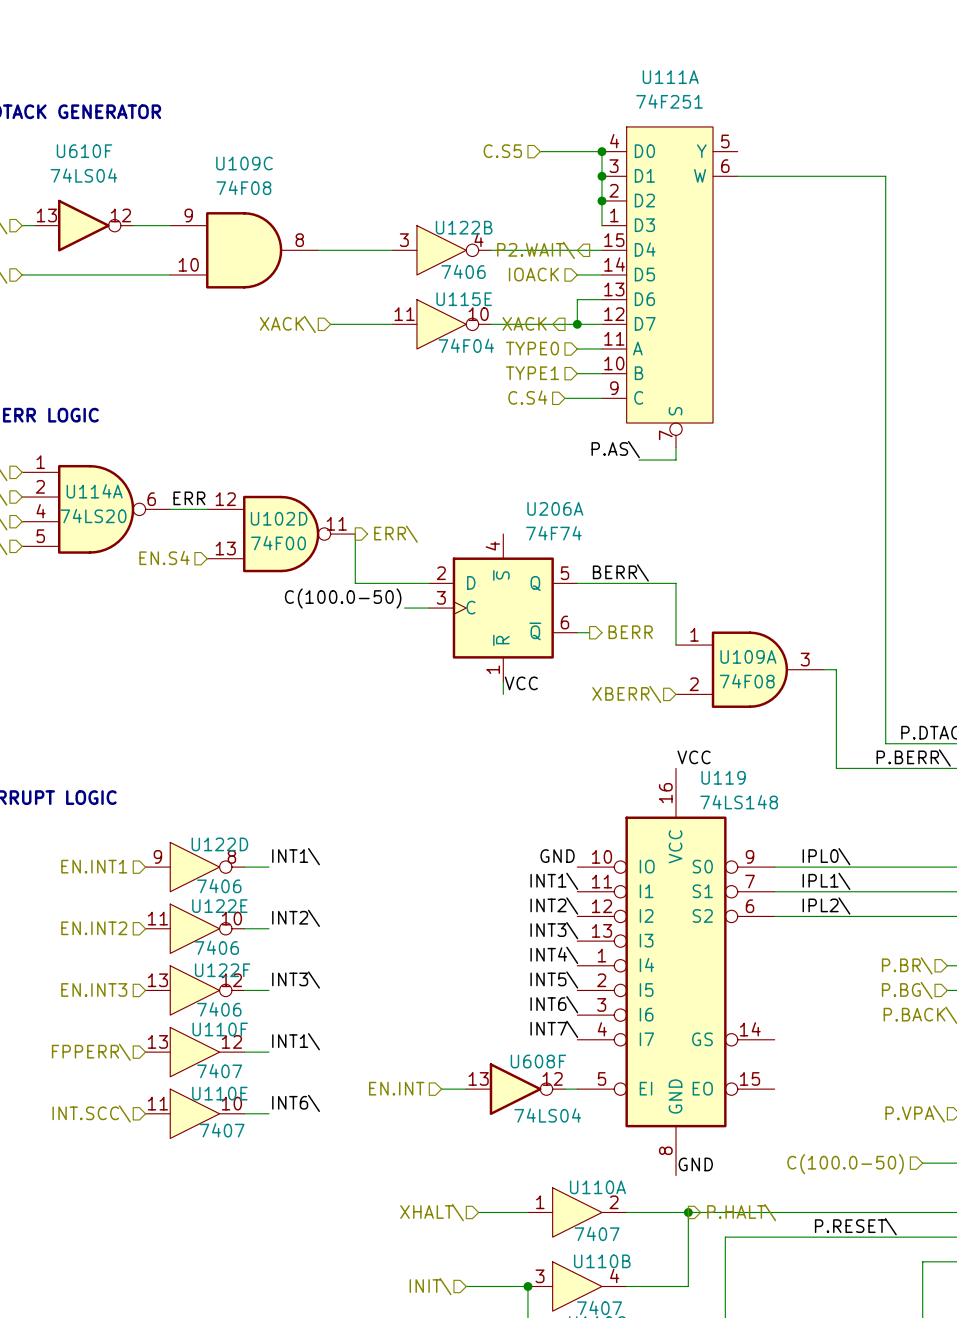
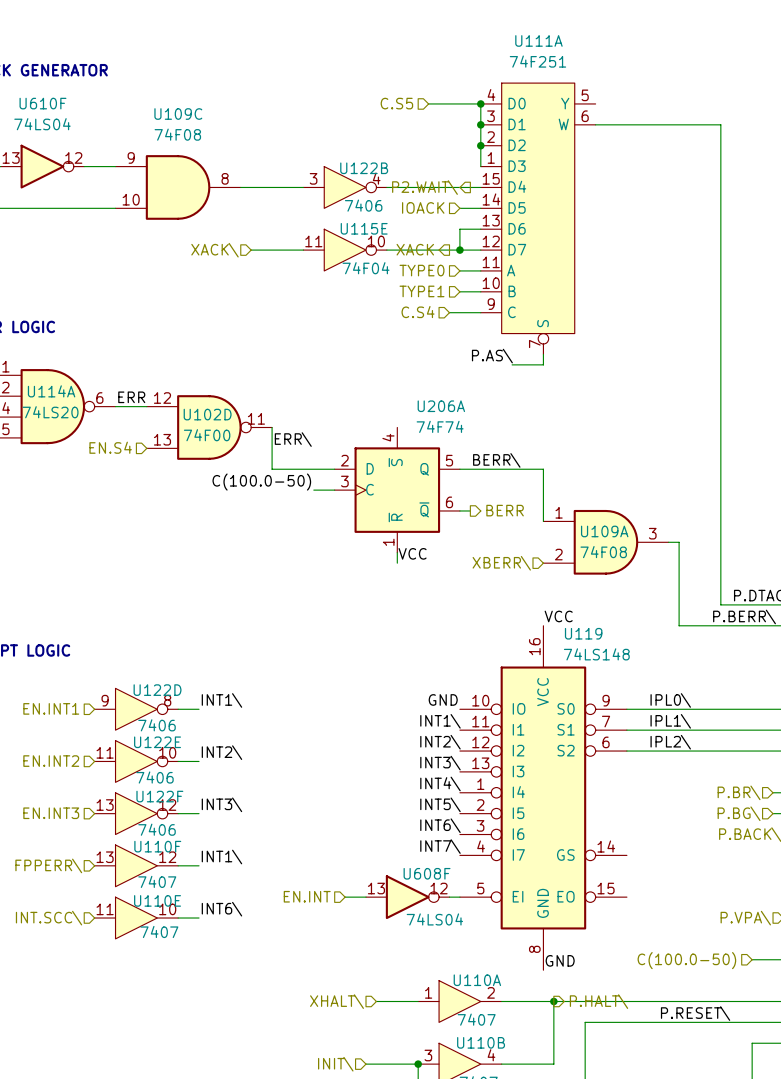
hierarchical label: ERR\ (396, 534) -> none
label: none -> ERR\ (293, 439)

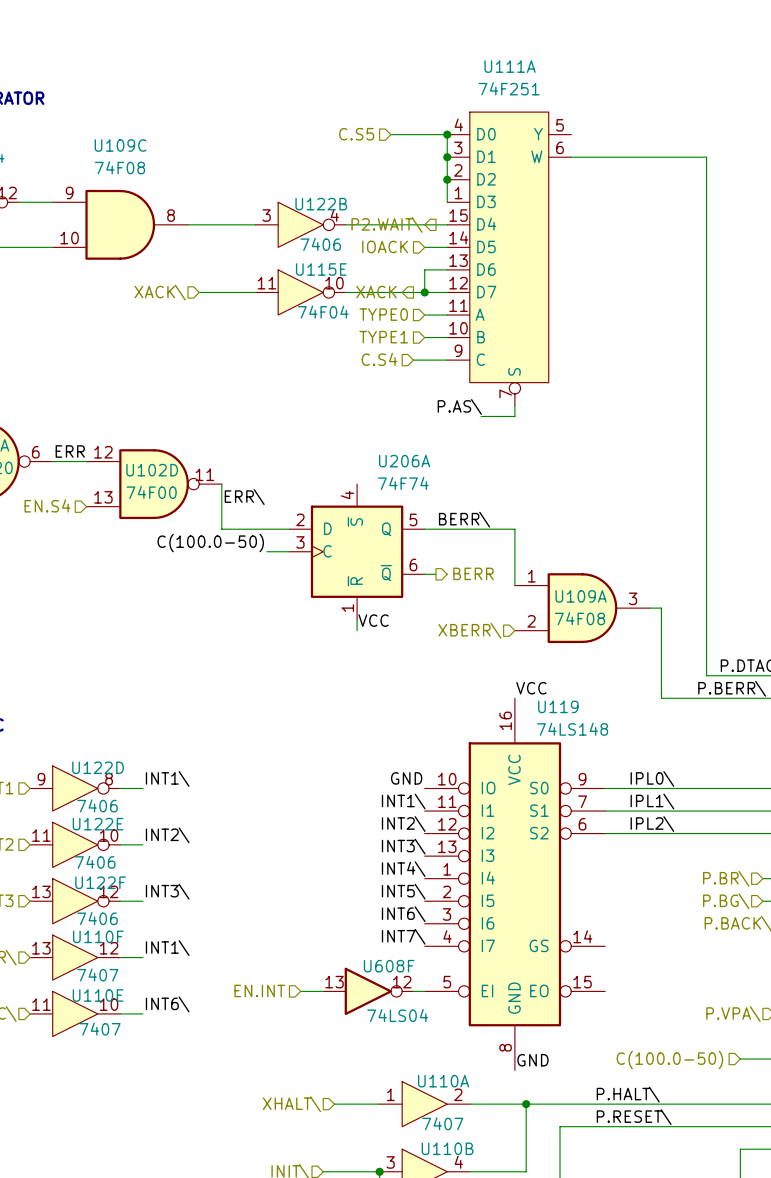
label: none -> P.HALT\ (628, 1094)
hierarchical label: P.HALT\ (599, 1001) -> none
label position: P.RESET\ (695, 1013) -> P.RESET\ (634, 1117)

